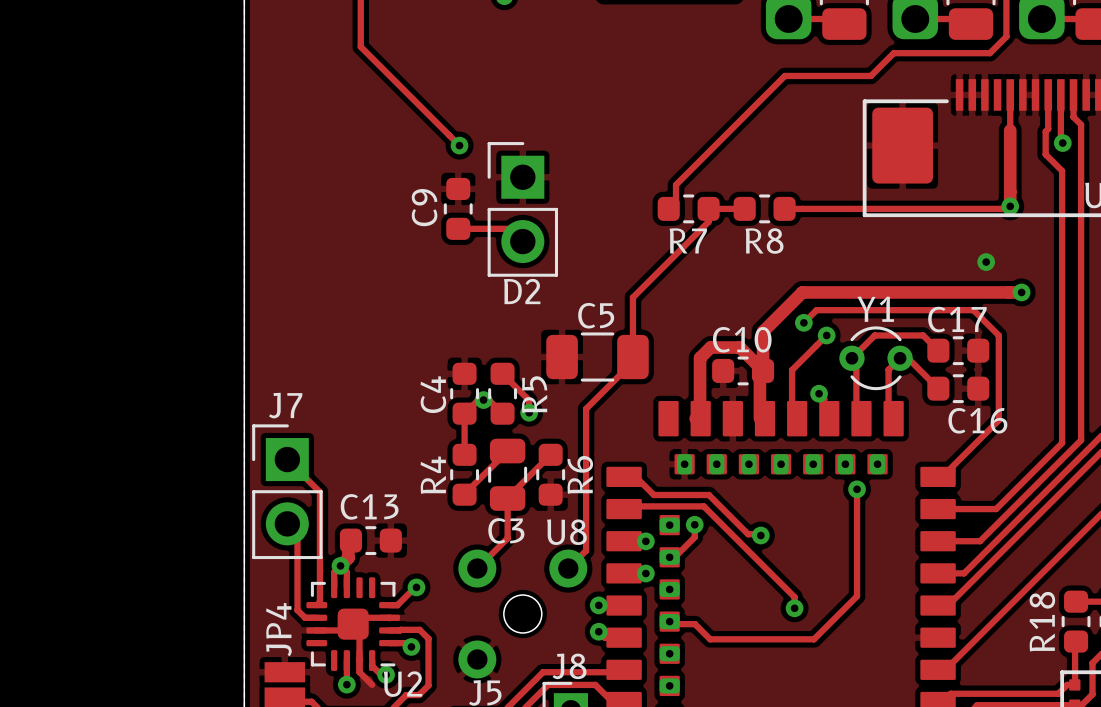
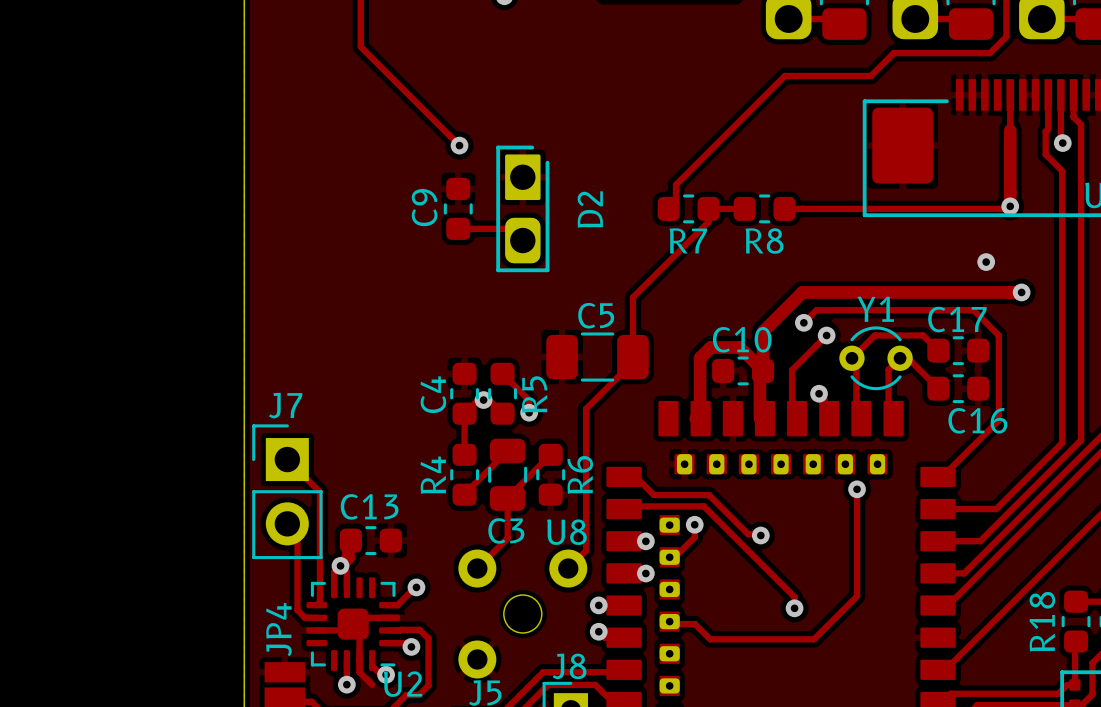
D2 footprint: [487, 142, 559, 277] -> [496, 143, 552, 273]
D2 name position: D2 (522, 291) -> D2 (590, 209)

